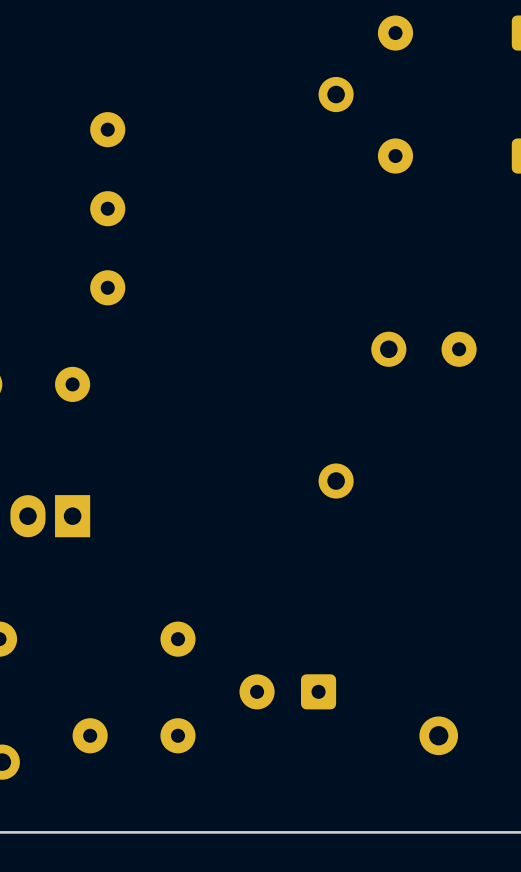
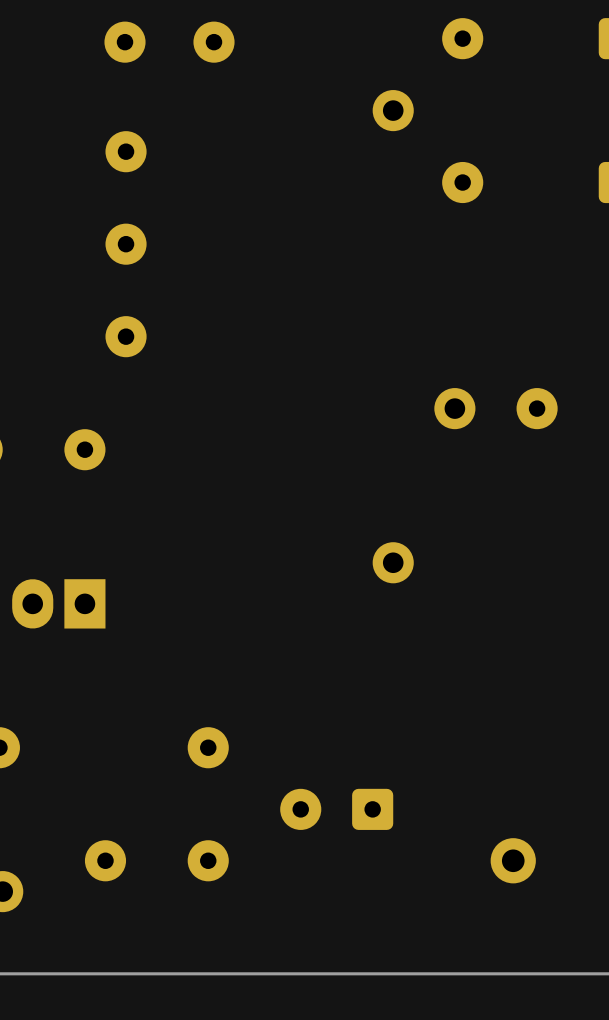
part: none -> (169, 42)

